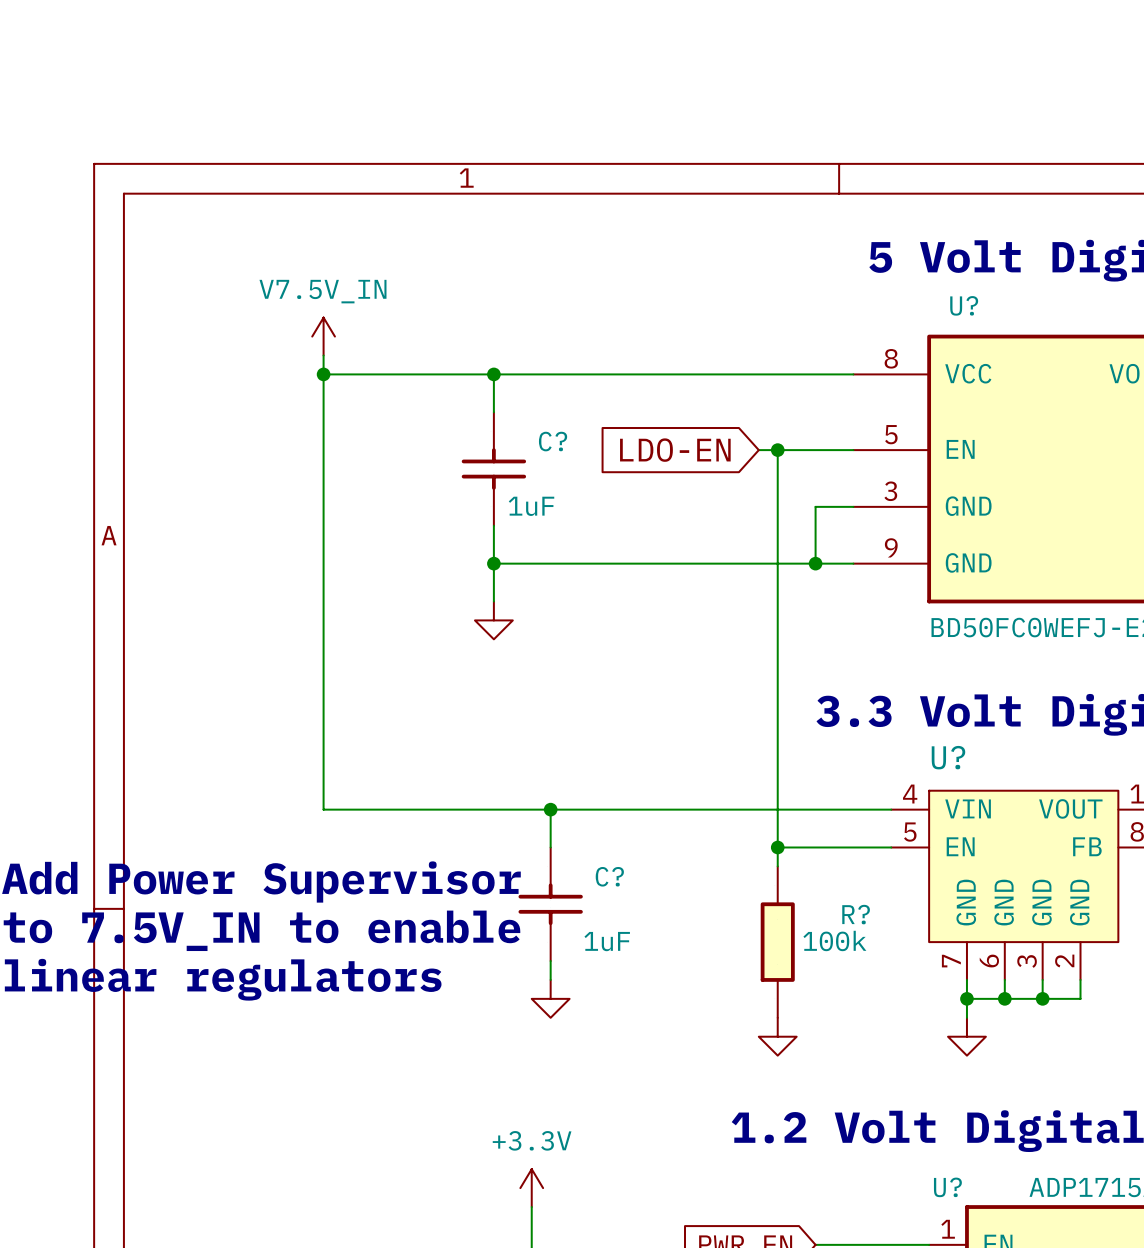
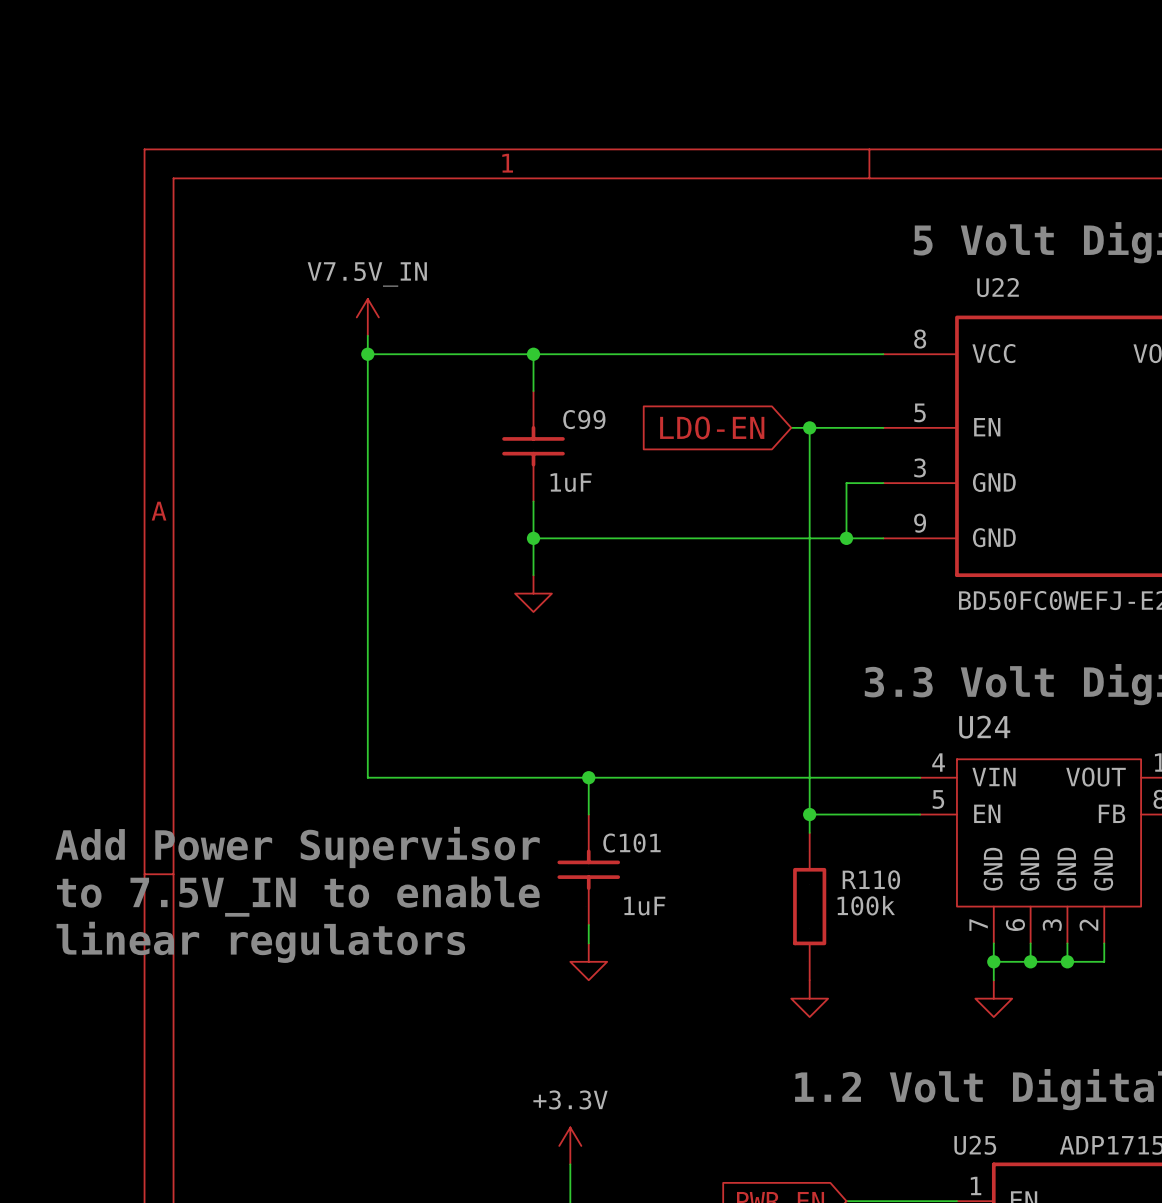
U? name: U? (964, 305) -> U22 (998, 287)
C? name: C? (553, 441) -> C99 (584, 419)
U? name: U? (948, 757) -> U24 (984, 727)
C? name: C? (609, 876) -> C101 (631, 843)
R? name: R? (856, 914) -> R110 (871, 879)
U? name: U? (947, 1187) -> U25 (975, 1145)

